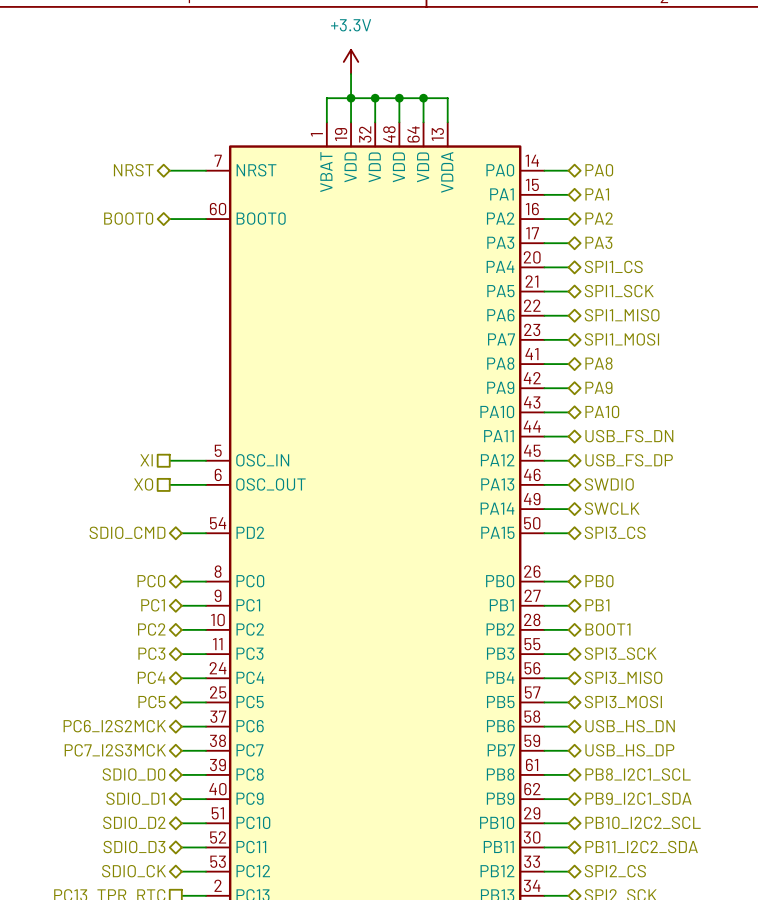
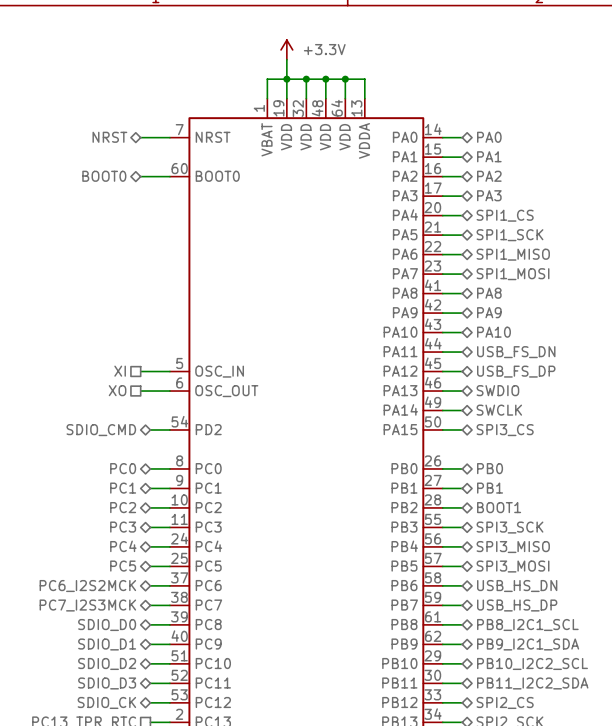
power symbol text position: +3.3V (351, 25) -> +3.3V (324, 49)

